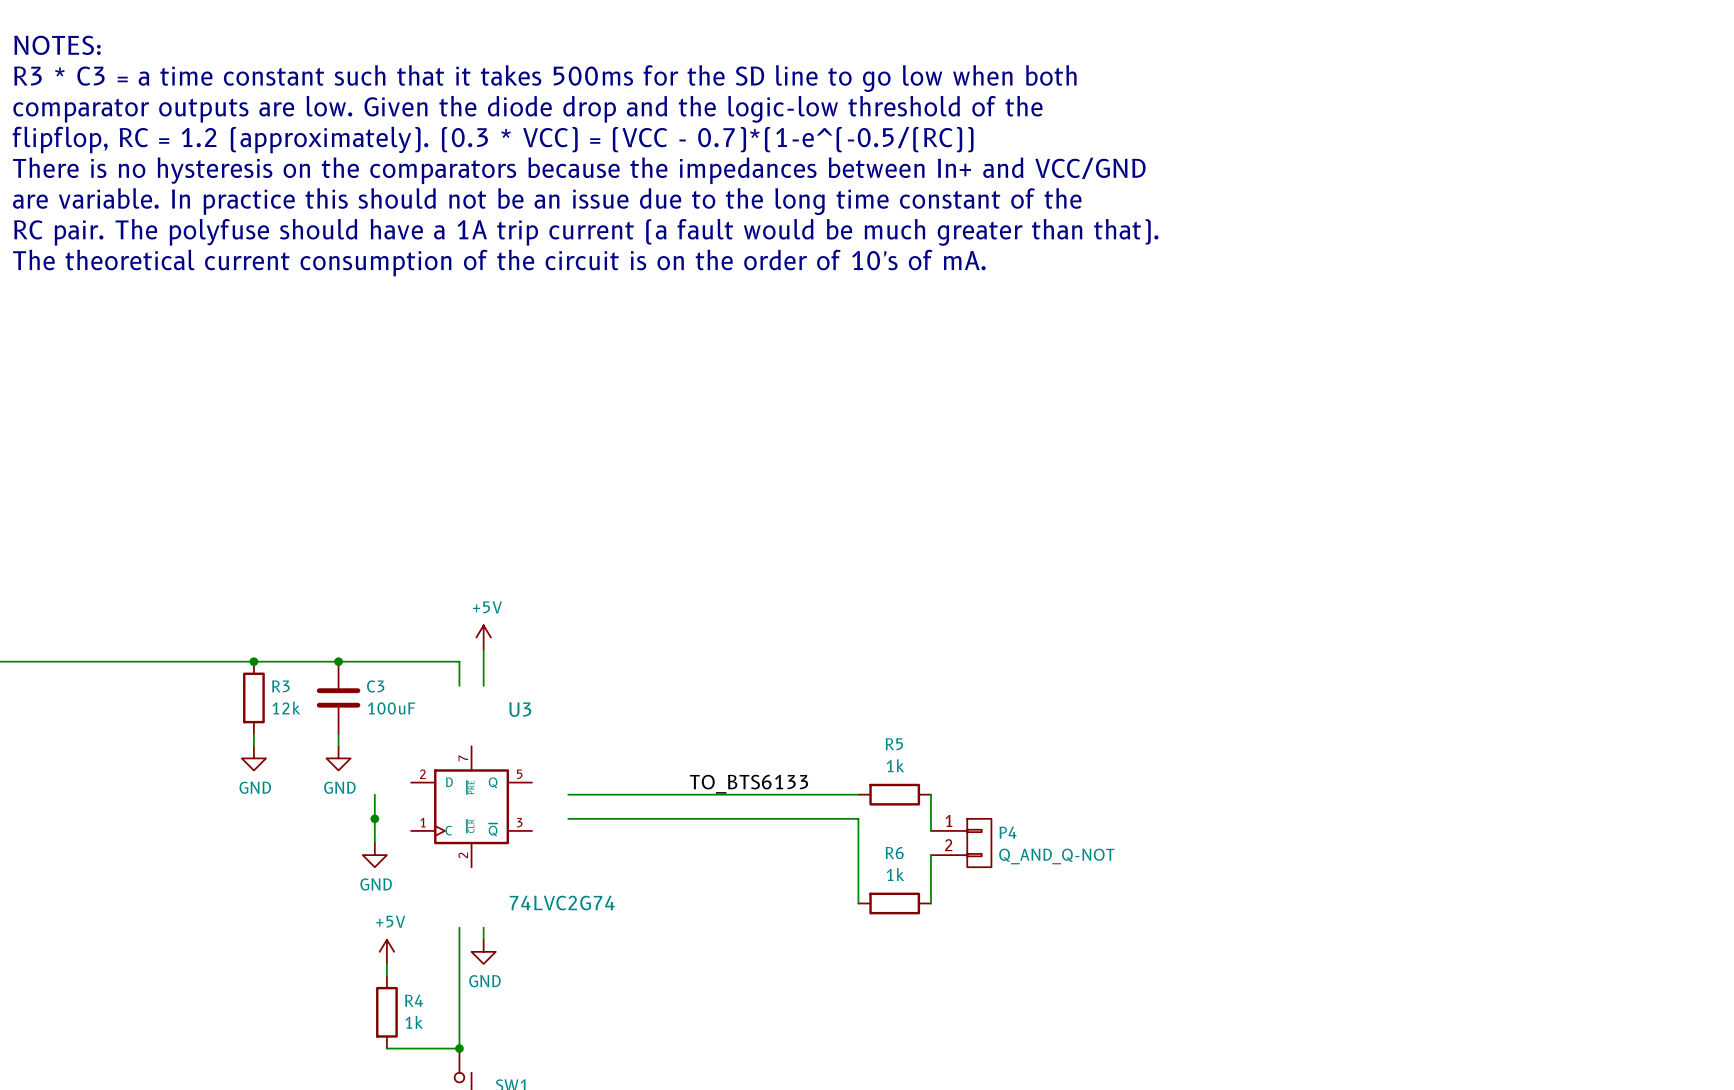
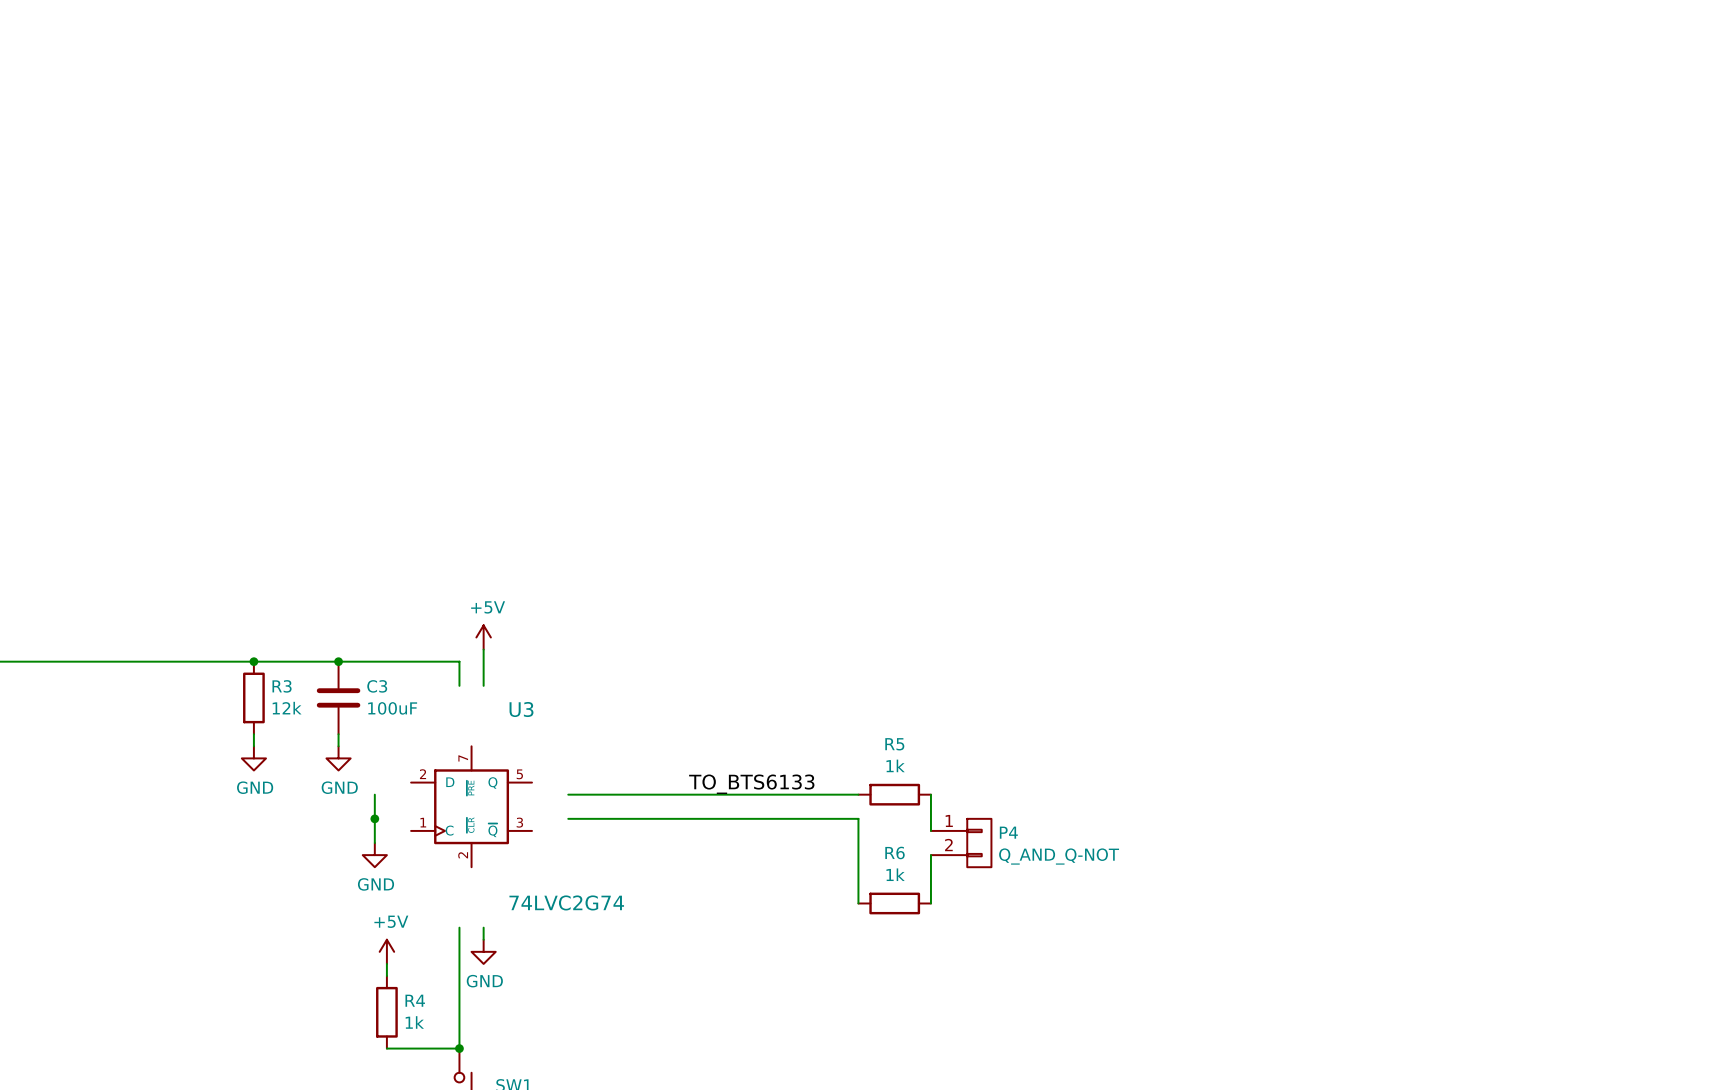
text: NOTES: (57, 45) -> none
text: R3 * C3 = a time constant such that it takes 500ms for the SD line to go low when both (545, 78) -> none
text: comparator outputs are low. Given the diode drop and the logic-low threshold of the (527, 109) -> none
text: flipflop, RC = 1.2 (approximately). (0.3 * VCC) = (VCC - 0.7)*(1-e^(-0.5/(RC)) (493, 140) -> none
text: There is no hysteresis on the comparators because the impedances between In+ and VCC/GND (579, 170) -> none
text: are variable. In practice this should not be an issue due to the long time constant of the (547, 201) -> none
text: RC pair. The polyfuse should have a 1A trip current (a fault would be much greater than that). (586, 232) -> none
text: The theoretical current consumption of the circuit is on the order of 10's of mA. (499, 263) -> none

